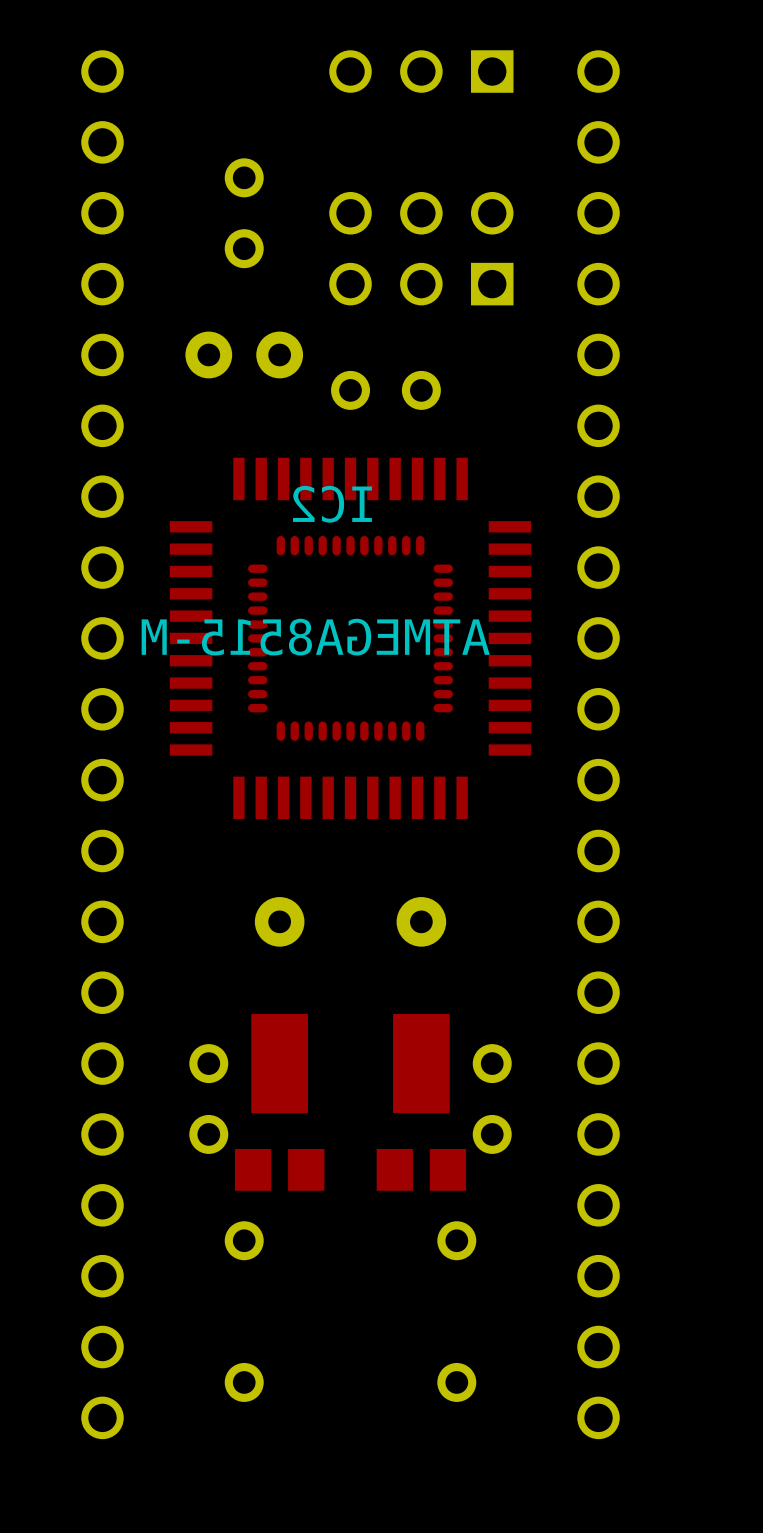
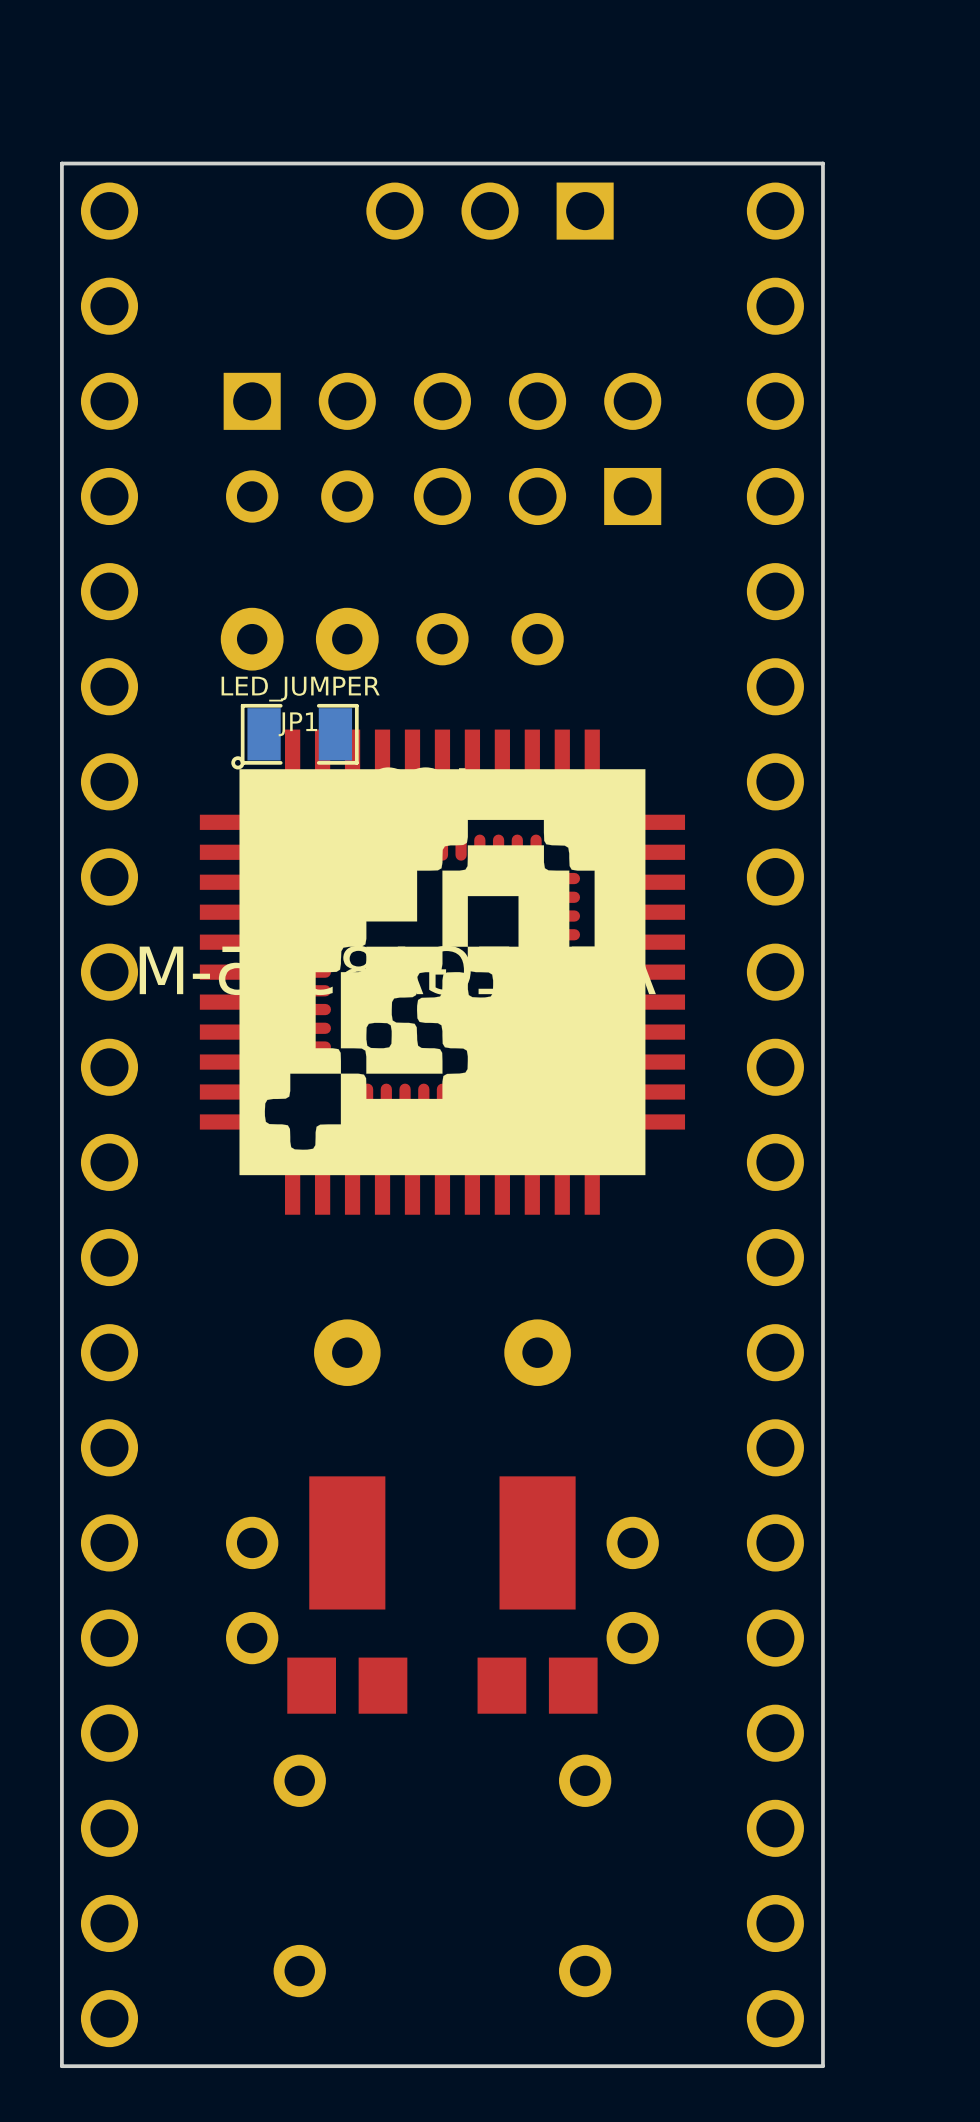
board edge: none -> (822, 163) (822, 2066) (61, 2066) (61, 163) (822, 163)
part position: (421, 71) -> (490, 211)
part footprint: [224, 158, 264, 269] -> [223, 372, 376, 430]
part: none -> (299, 496)
part position: (244, 354) -> (299, 639)
JP1: none -> LED_JUMPER (294, 736)
drawing: none -> [239, 769, 646, 1176]

